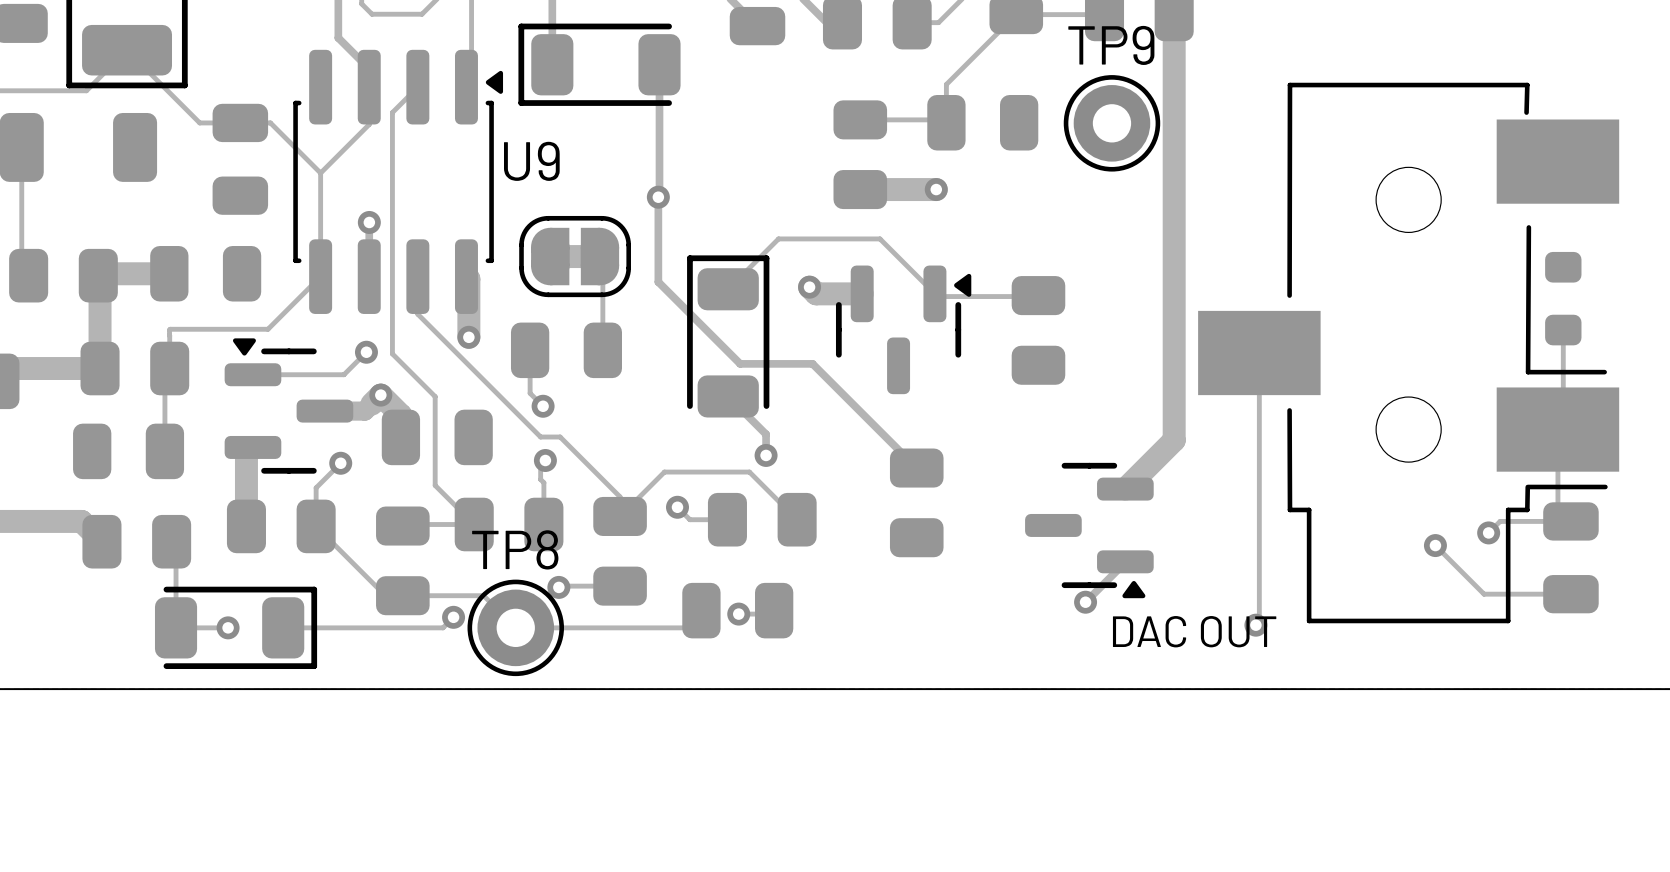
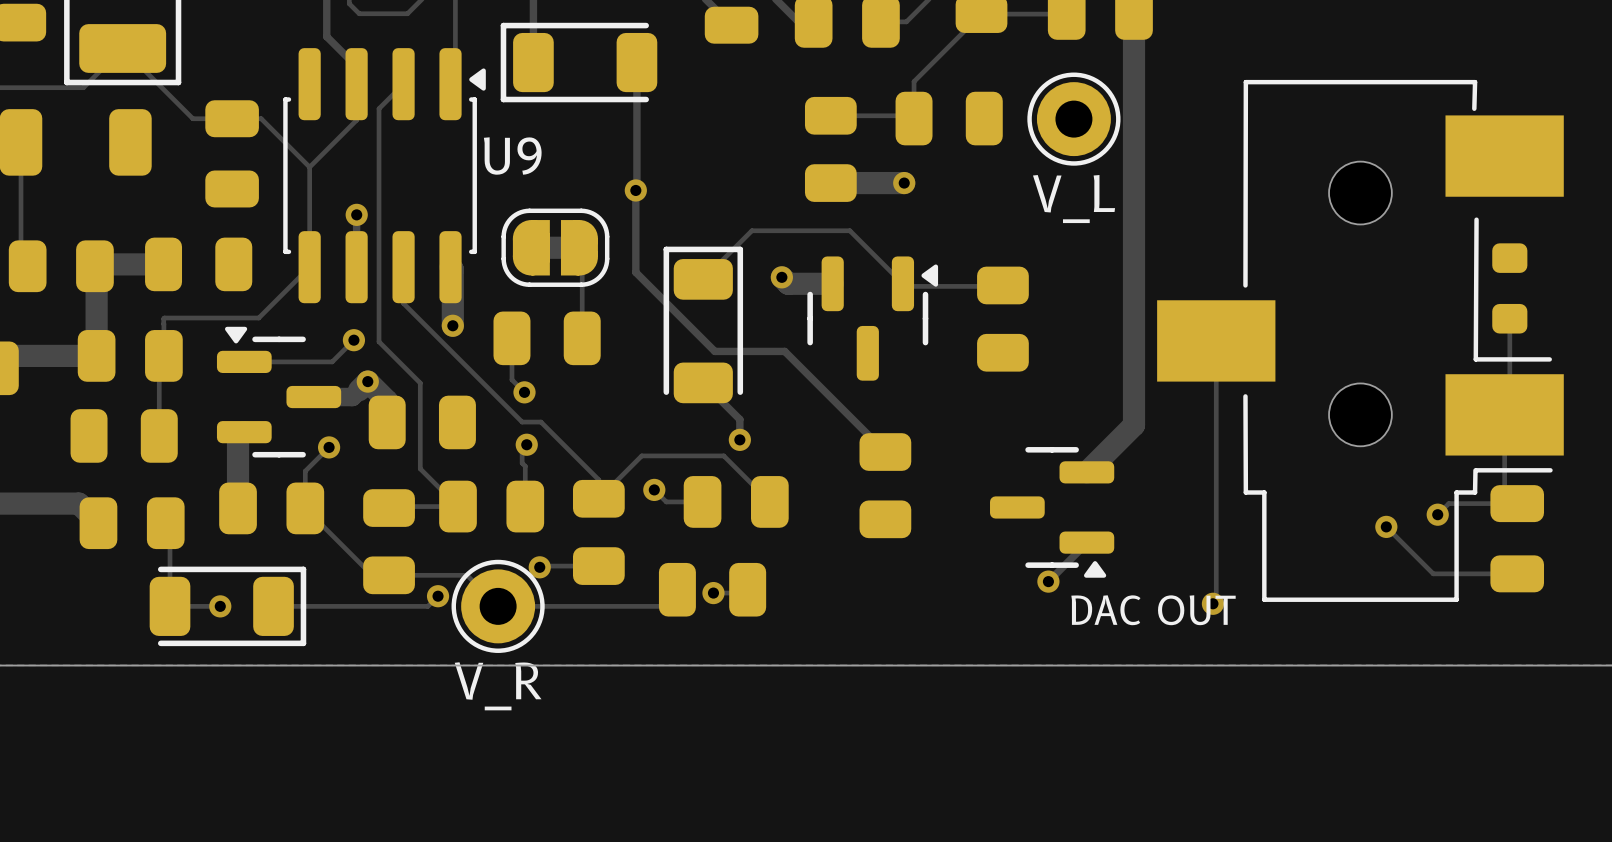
TP9 name: TP9 (1111, 45) -> none
TP9 value: none -> V_L (1074, 199)
TP8 name: TP8 (515, 549) -> none
TP8 value: none -> V_R (498, 686)

